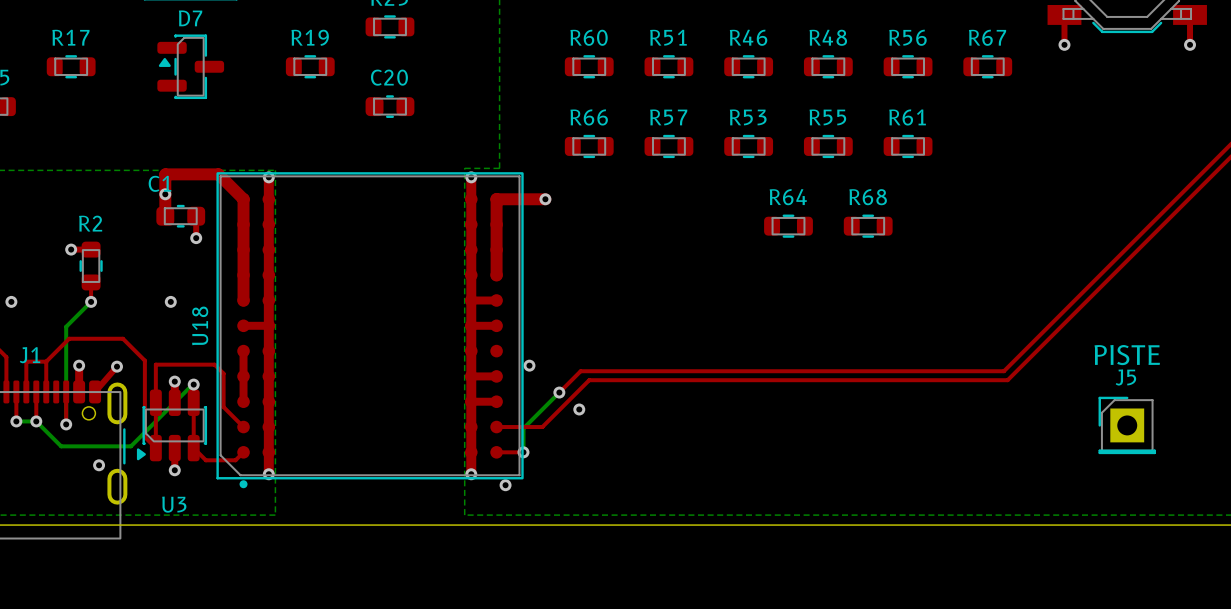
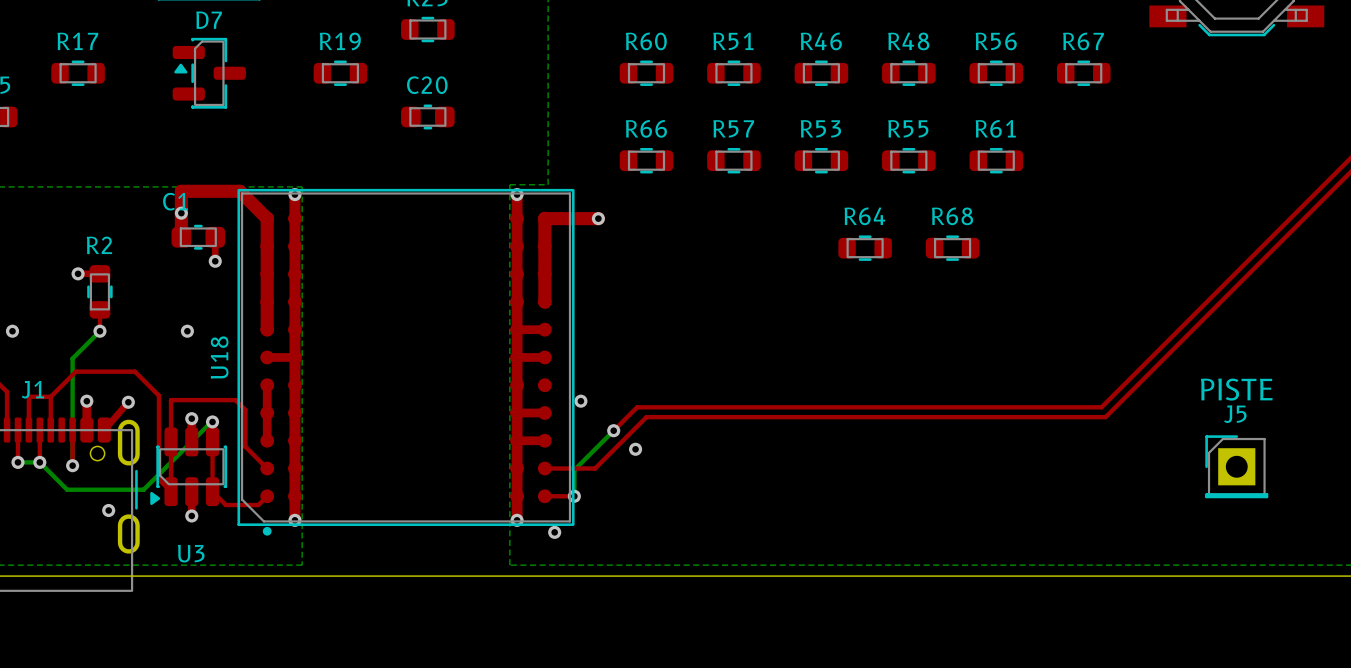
top track: (1064, 14) (1064, 44) -> none
top track: (1190, 14) (1190, 44) -> none
via: (1064, 44) -> none
via: (1190, 44) -> none

